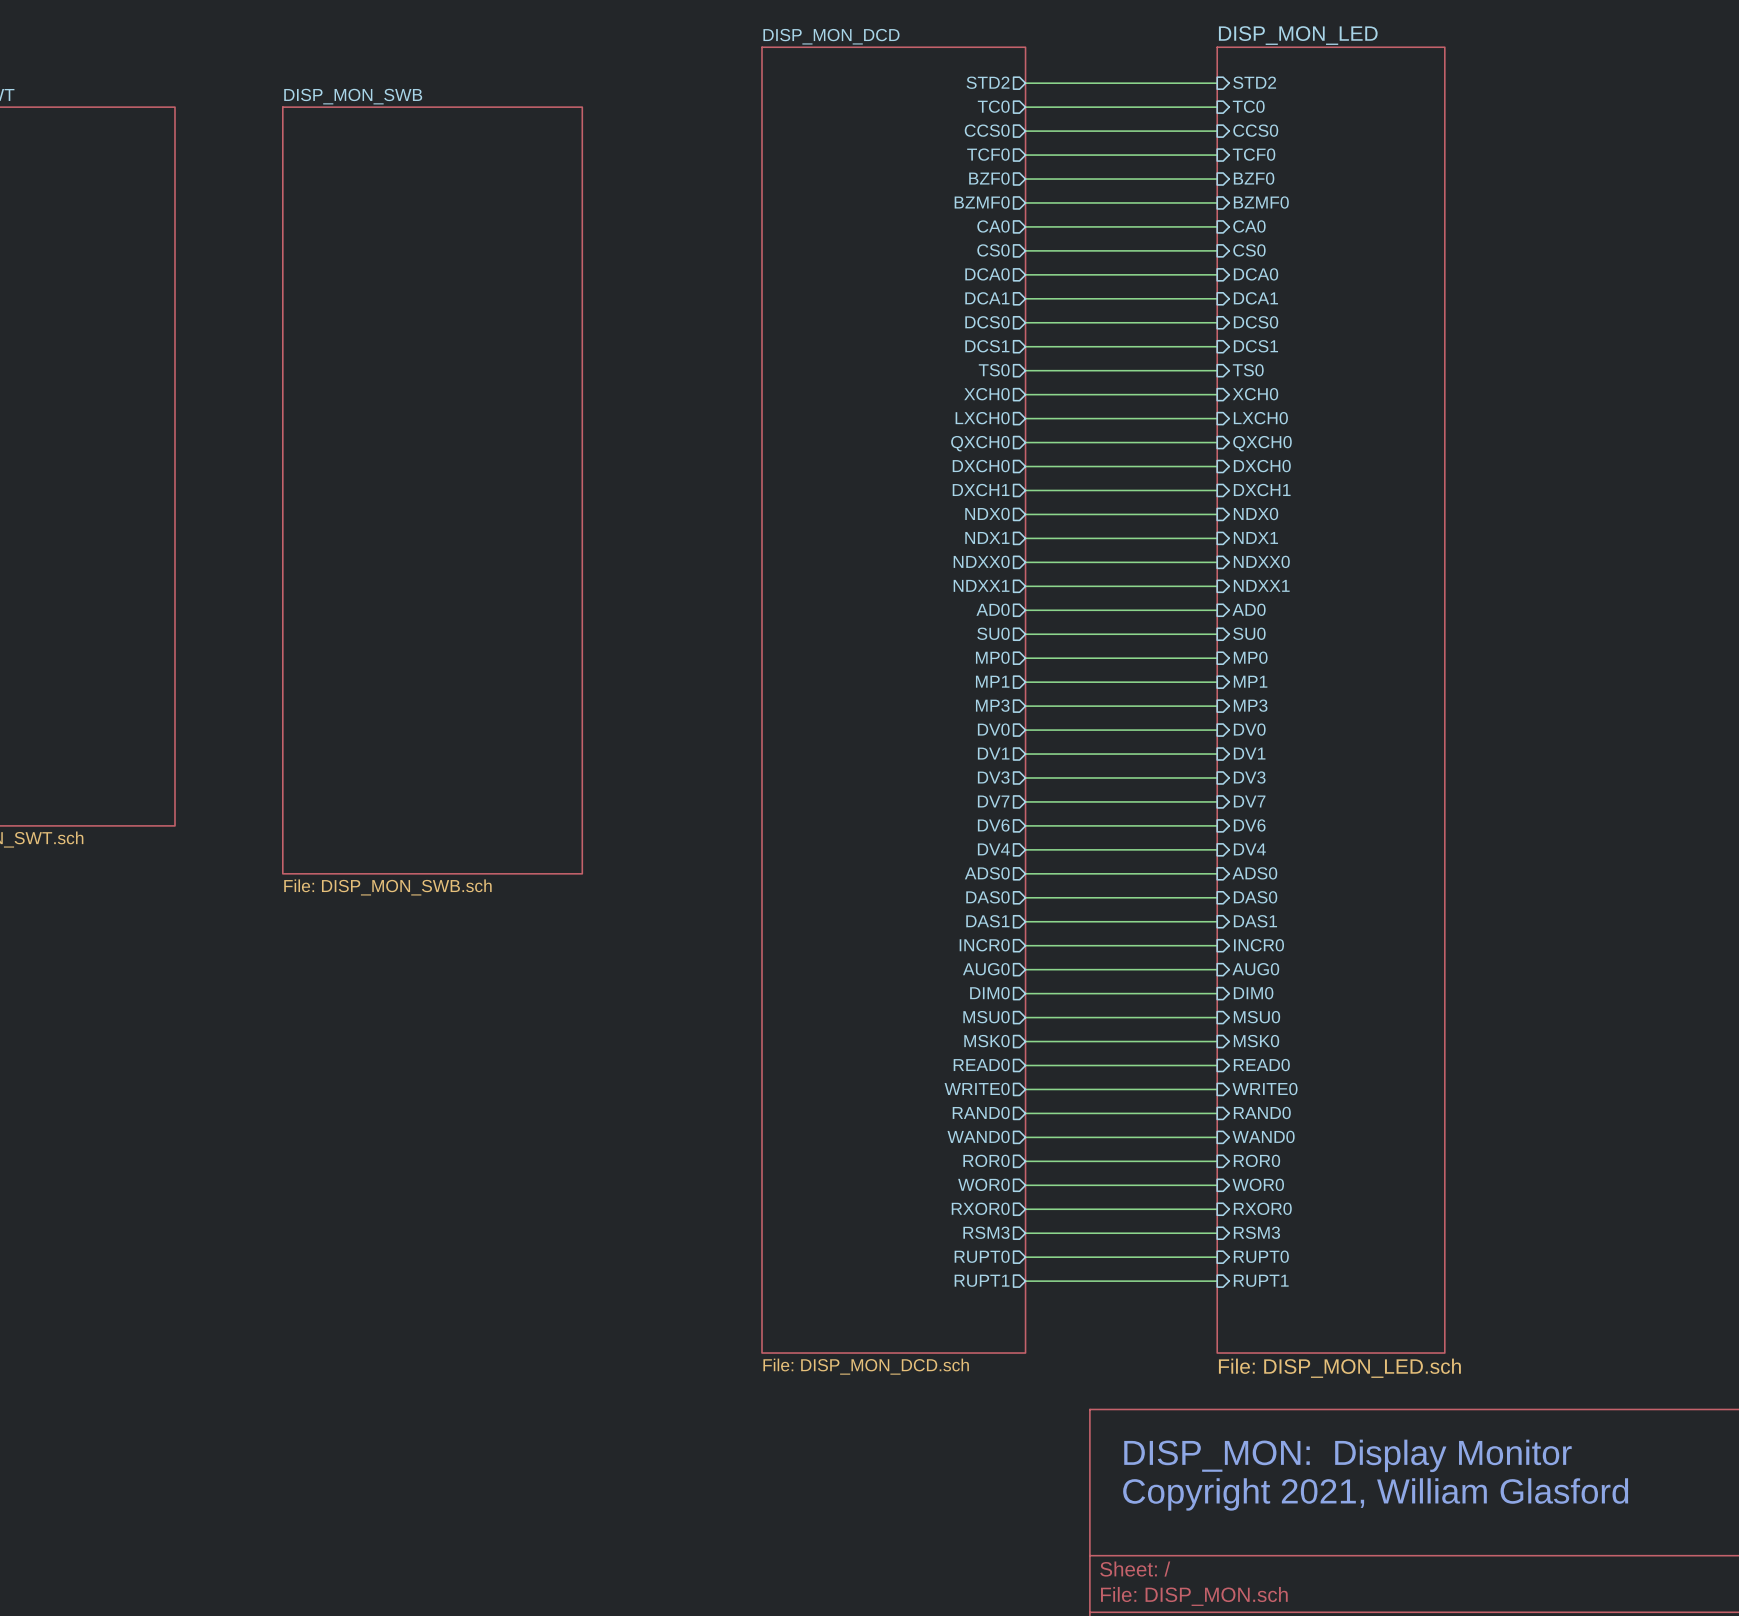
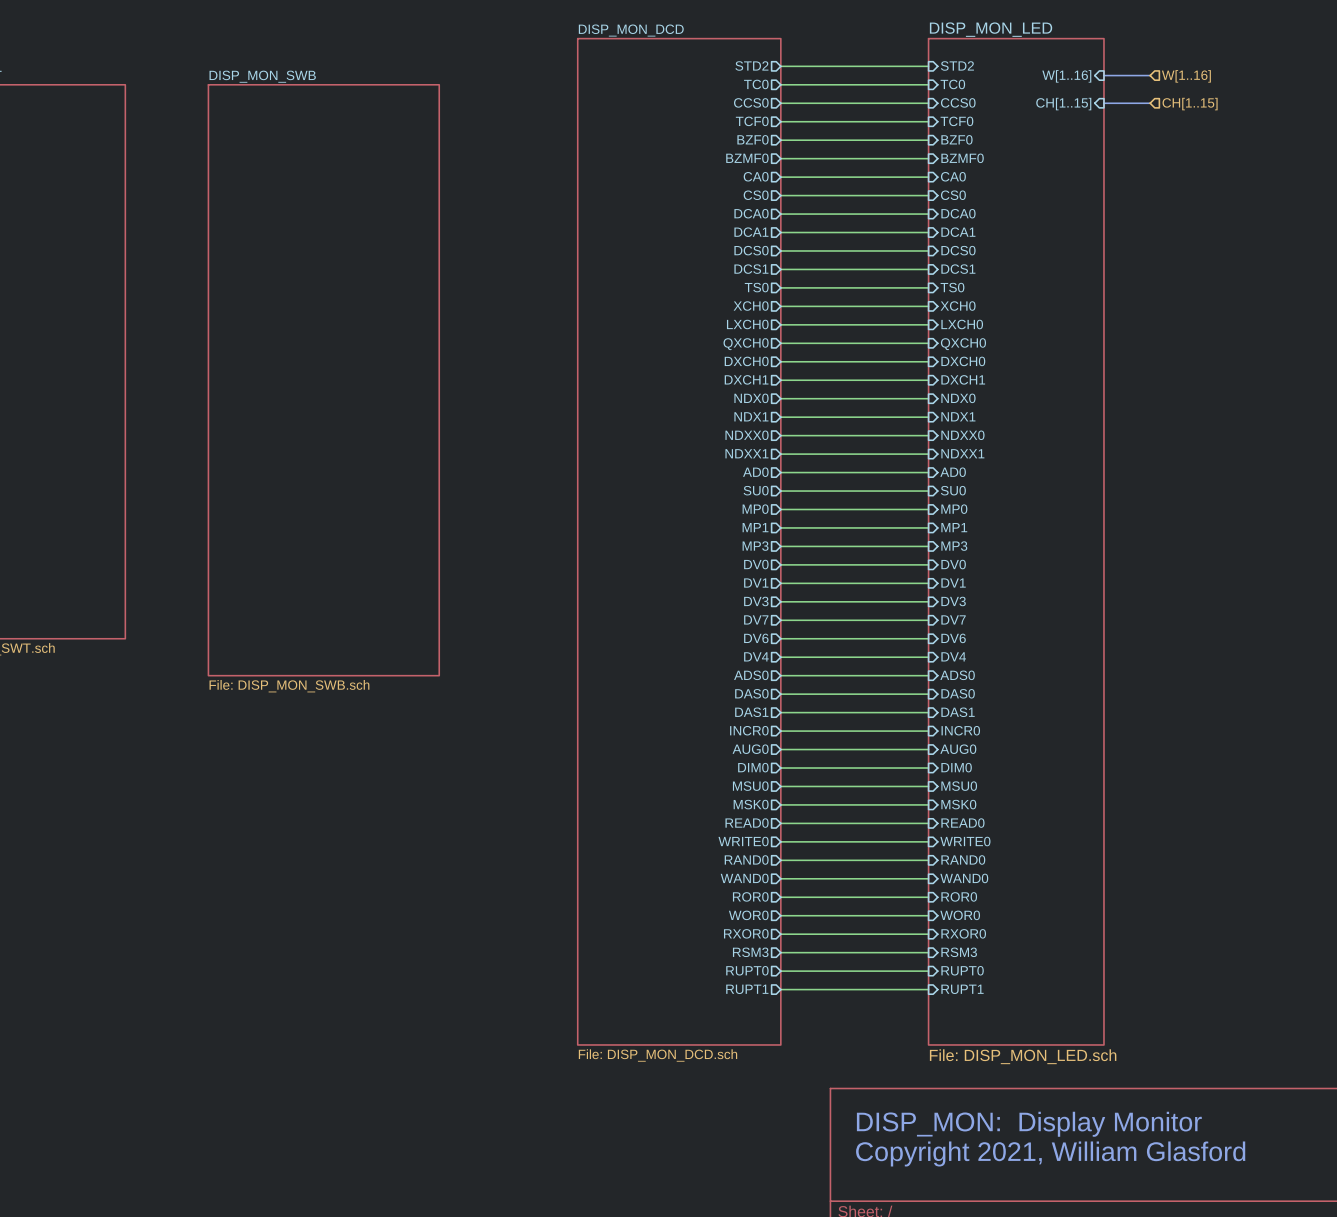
bus: none -> (1103, 75) (1150, 75)
sheet pin: none -> W[1..16] (1066, 76)
hierarchical label: none -> W[1..16] (1186, 76)
bus: none -> (1103, 103) (1150, 103)
sheet pin: none -> CH[1..15] (1063, 104)
hierarchical label: none -> CH[1..15] (1190, 104)

